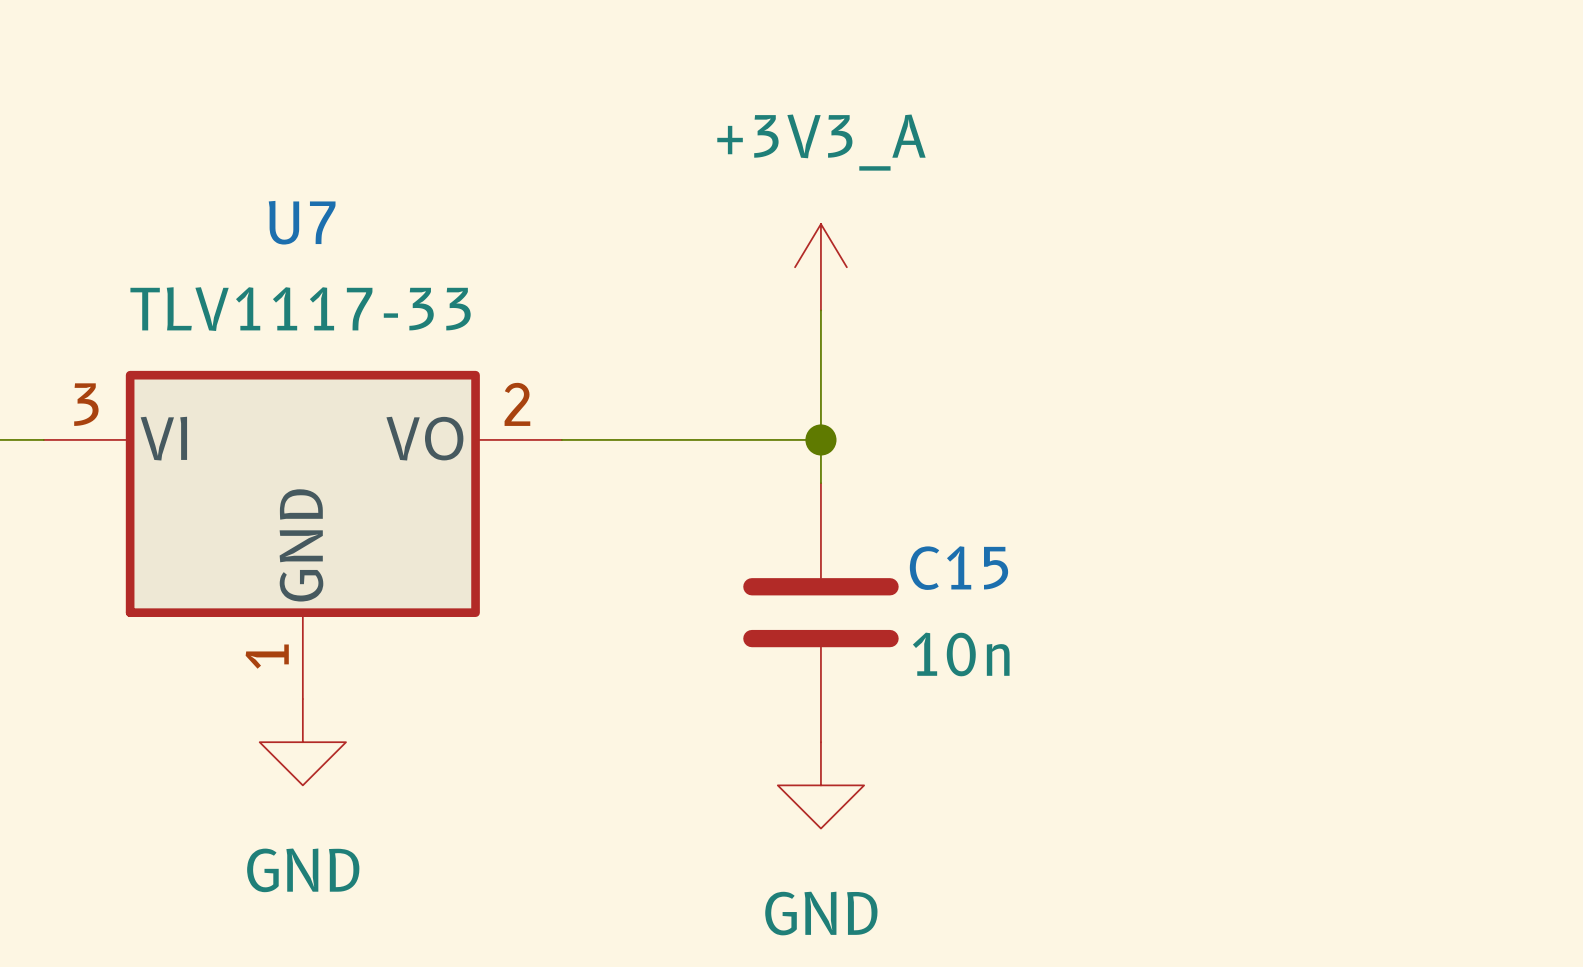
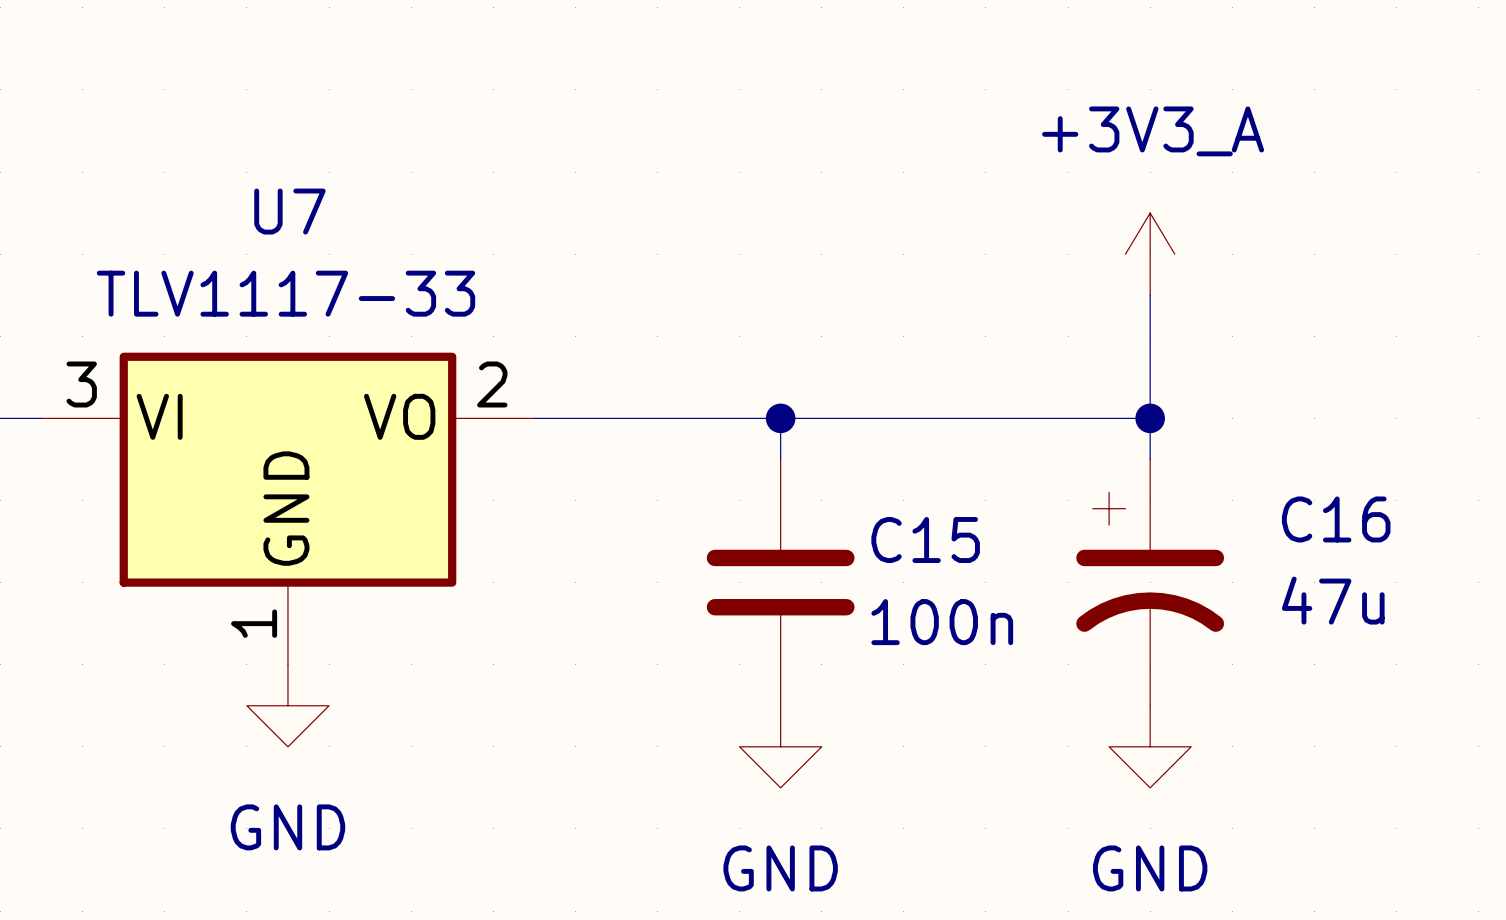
power symbol position: +3V3_A (820, 267) -> +3V3_A (1150, 254)
wire: (820, 310) (820, 439) -> (1150, 418) (780, 418)
wire: none -> (1150, 295) (1150, 459)
junction: none -> (1150, 418)
C16: none -> 47u (1150, 582)
C15 value: 10n (961, 654) -> 100n (942, 622)
power symbol: none -> GND (1150, 746)

